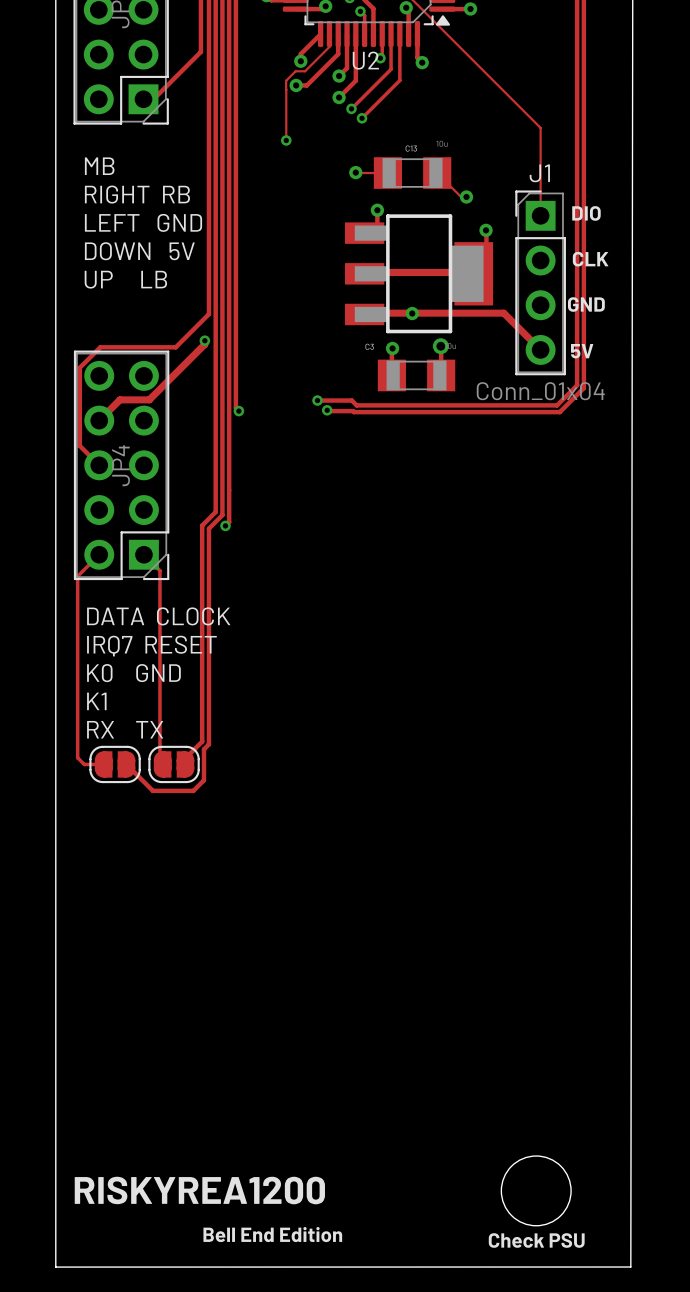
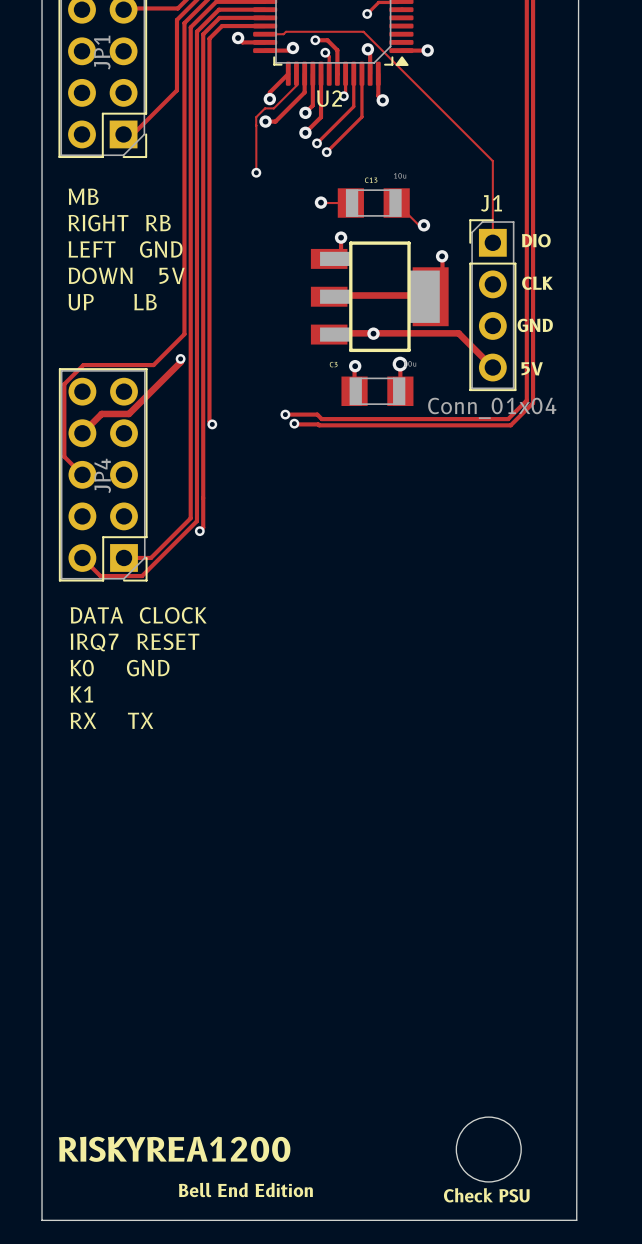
track: (202, 525) (202, 741) (185, 758) (185, 764) -> (178, 530) (151, 557) (124, 557)
track: (208, 528) (208, 744) (203, 749) (203, 780) (193, 790) (152, 790) (126, 764) -> (184, 533) (142, 576) (100, 576) (82, 557)
track: (99, 554) (77, 576) (77, 757) (84, 764) (103, 764) -> none
track: (143, 554) (159, 570) (159, 761) (162, 764) -> none
part: (115, 764) -> none
part: (174, 764) -> none

